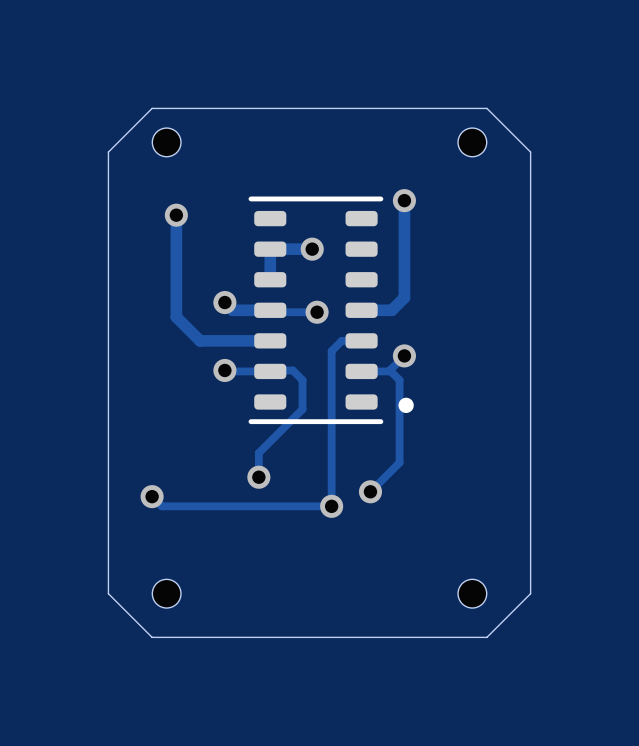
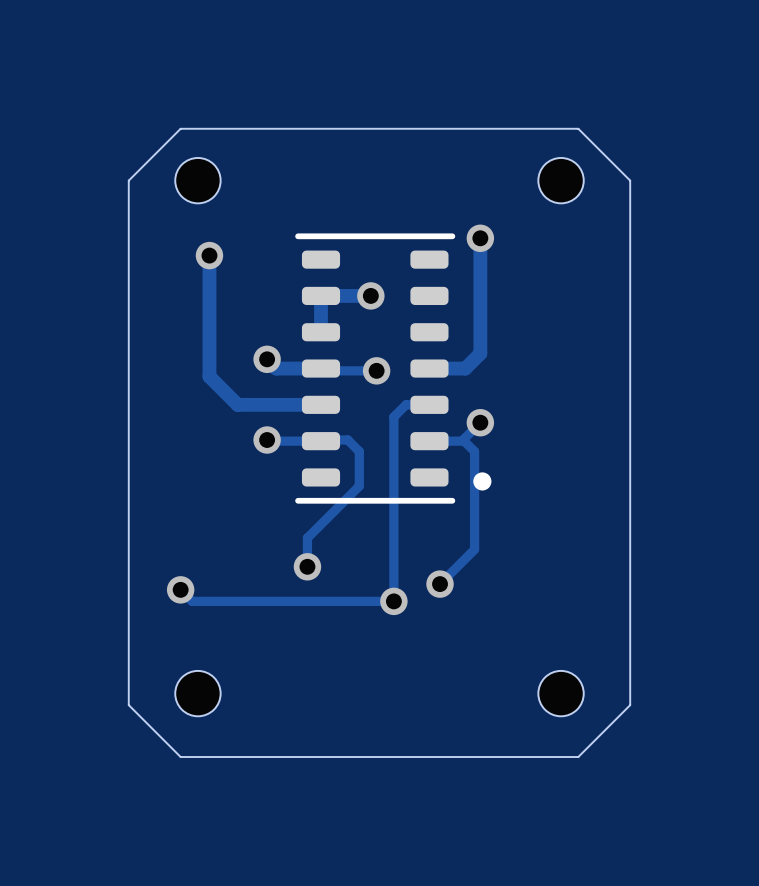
hole size: [152, 128, 181, 157] -> [175, 157, 221, 204]
hole size: [458, 128, 487, 157] -> [538, 157, 584, 204]
hole size: [152, 579, 181, 609] -> [175, 670, 221, 717]
hole size: [458, 579, 487, 609] -> [538, 670, 584, 717]

